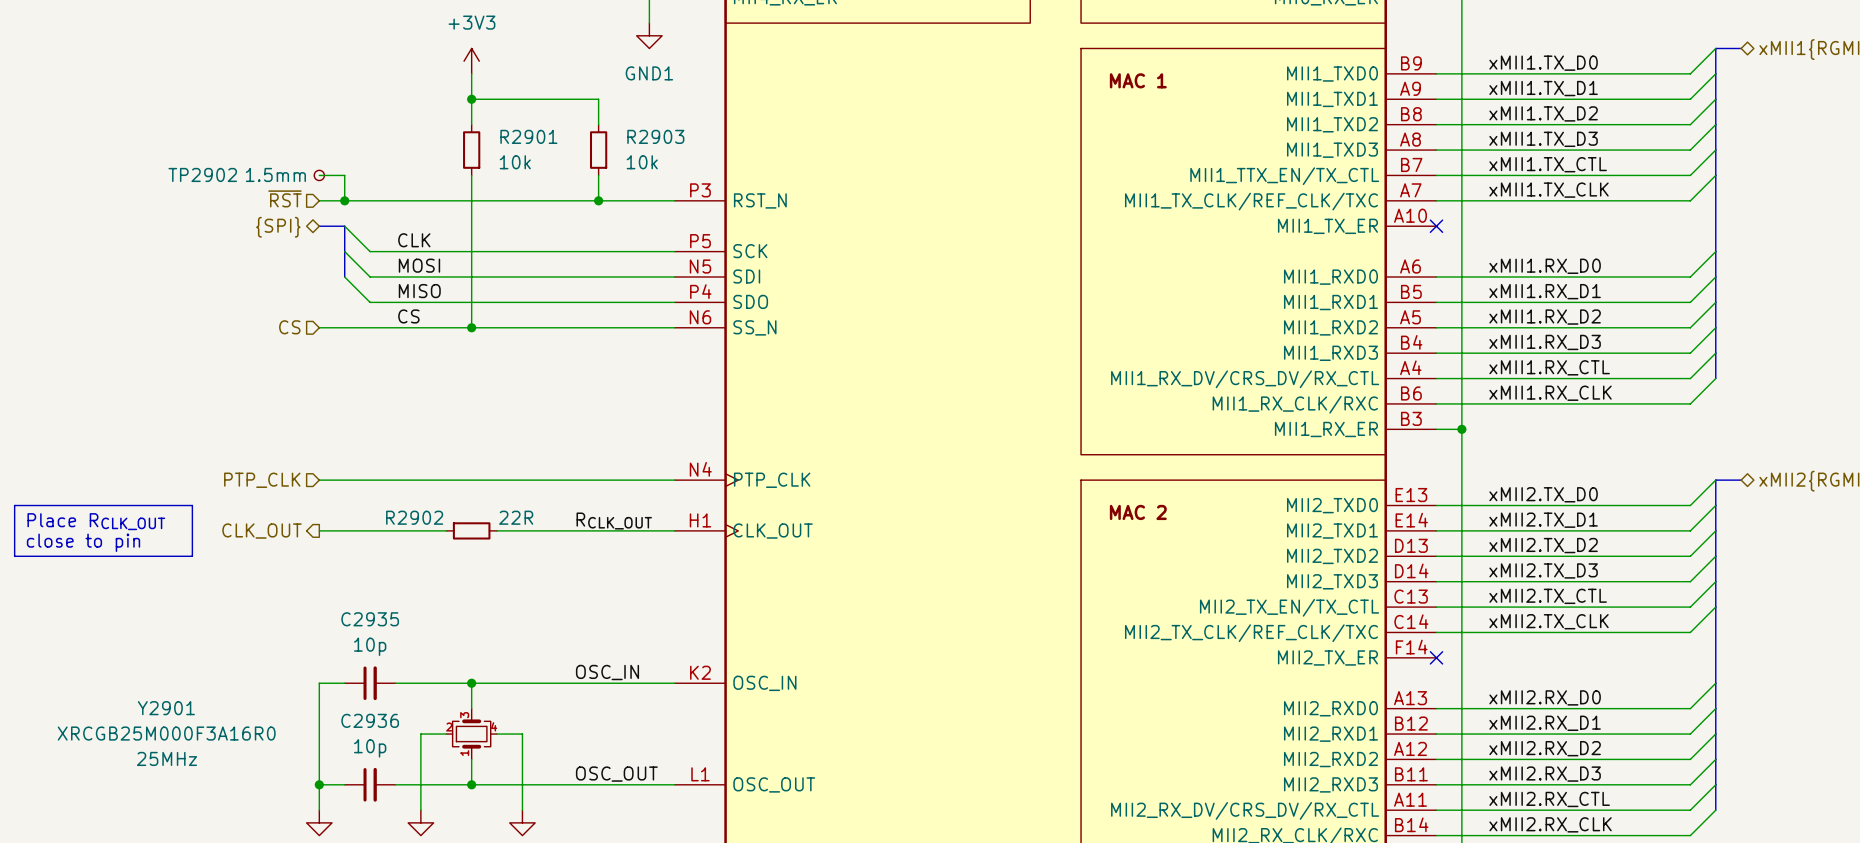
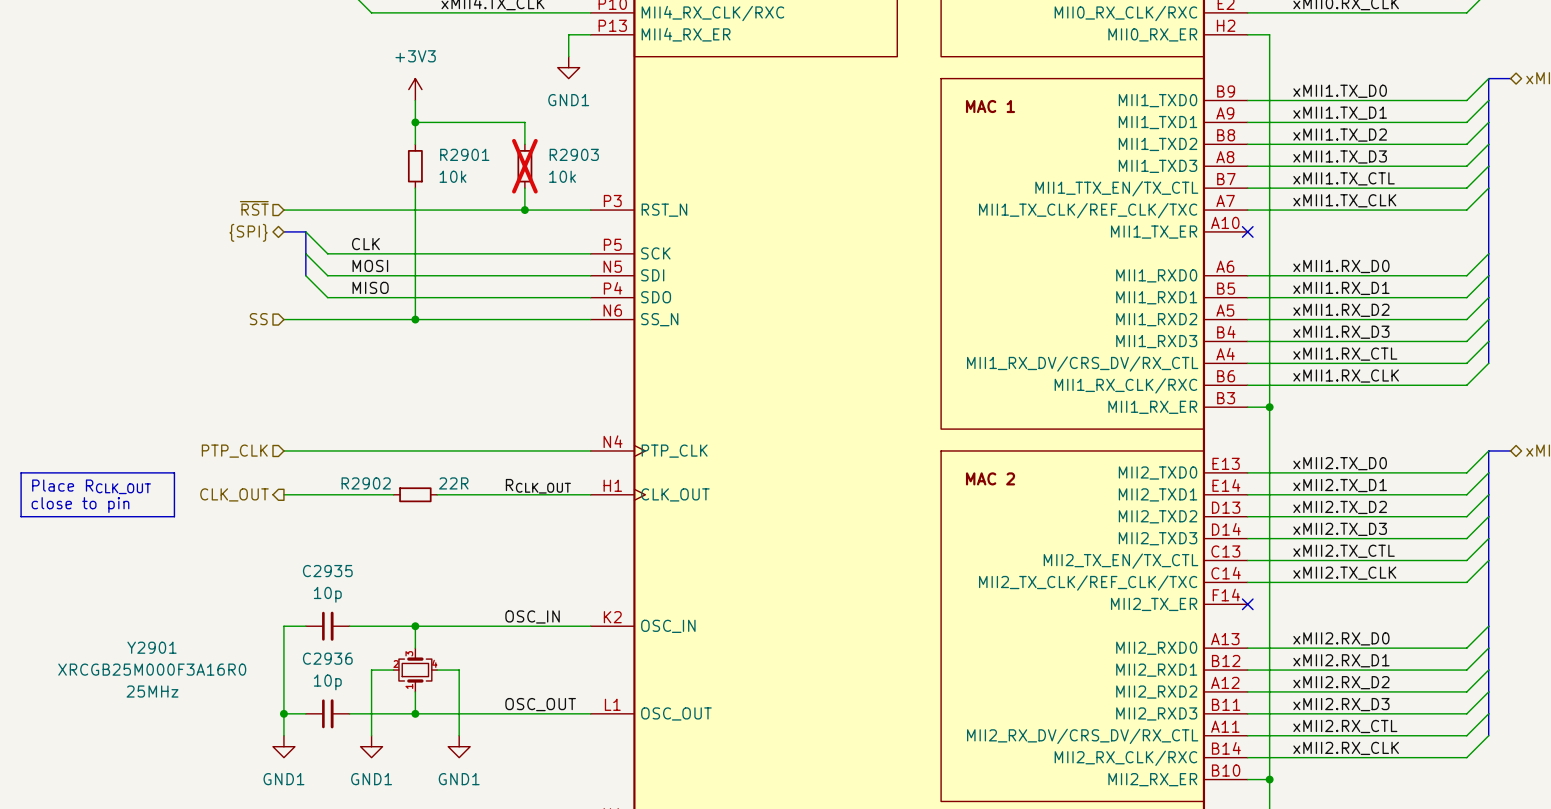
R2903 do-not-place cross: none -> (524, 166)
wire: (319, 175) (344, 175) (344, 200) -> none
TP2902: 1.5mm (319, 175) -> none
junction: (344, 200) -> none
label: CS (408, 316) -> none
hierarchical label: CS (289, 327) -> SS (258, 319)

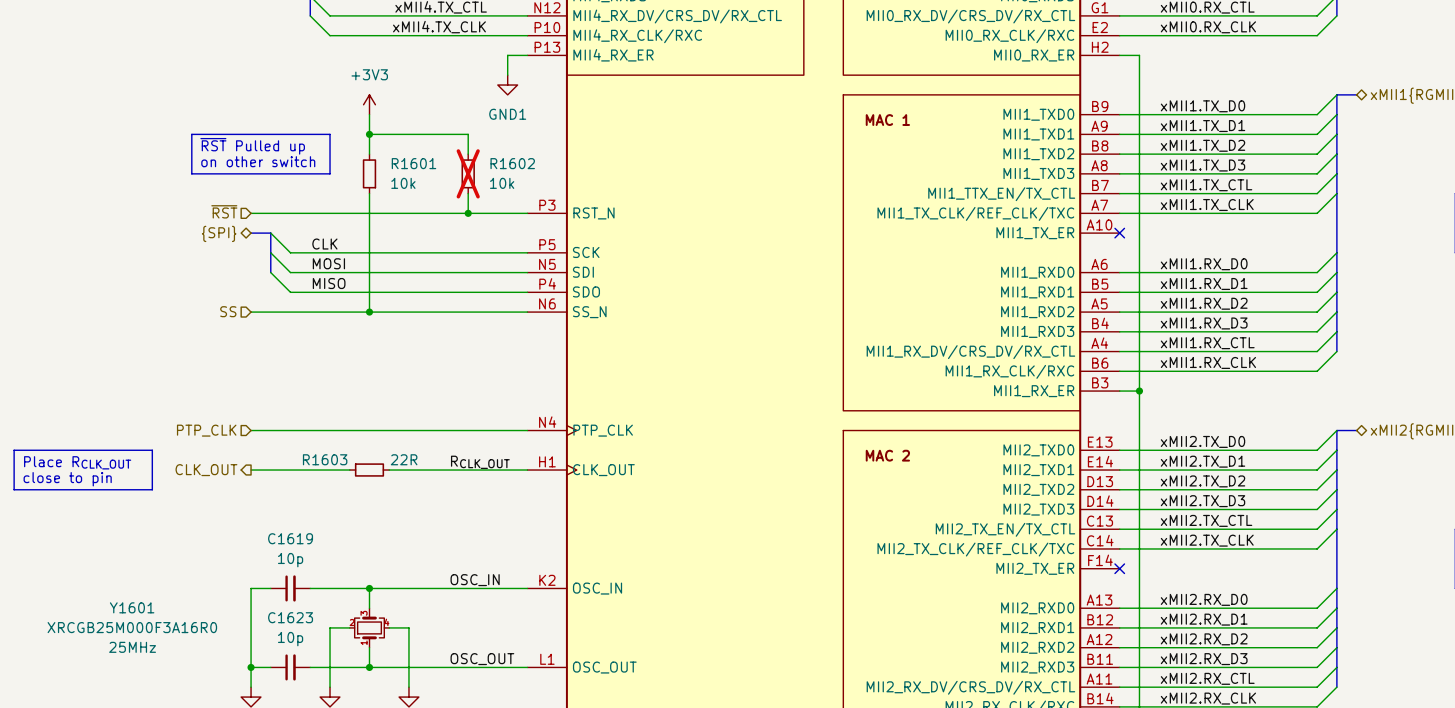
line: none -> (191, 134) (330, 134) (330, 173) (191, 173) (191, 134)
text: none -> ~{RST} Pulled up (252, 146)
text: none -> on other switch (258, 161)
R2901 name: R2901 (464, 154) -> R1601 (413, 163)
R2903 name: R2903 (574, 154) -> R1602 (512, 163)
R2902 name: R2902 (366, 483) -> R1603 (325, 459)
C2935 name: C2935 (327, 571) -> C1619 (290, 538)
Y2901 name: Y2901 (152, 647) -> Y1601 (132, 607)
C2936 name: C2936 (327, 658) -> C1623 (290, 617)

